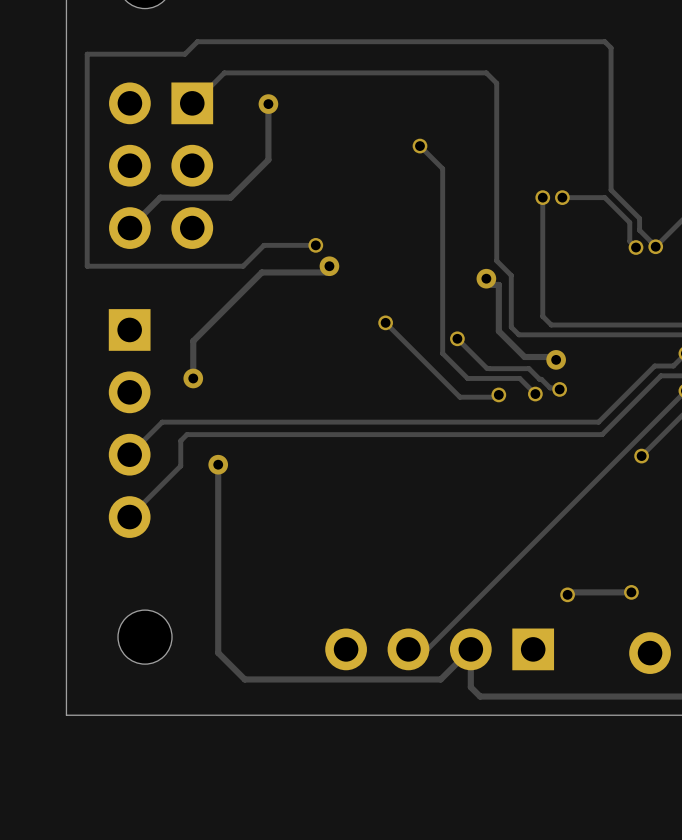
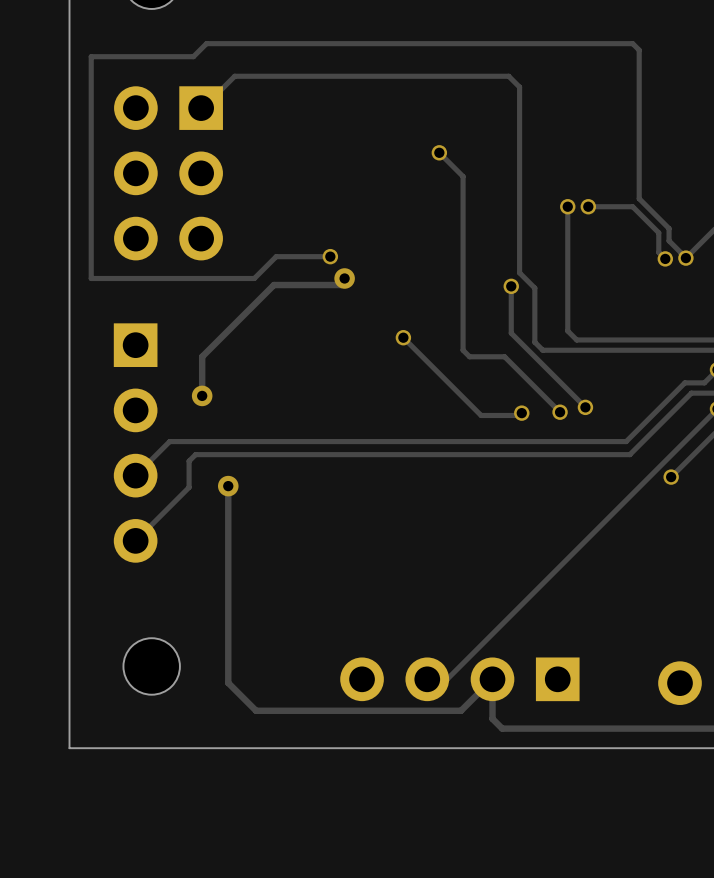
track: (268, 104) (268, 159) (230, 197) (160, 197) (129, 228) -> none
via: (268, 104) -> none
track: (486, 278) (492, 284) (498, 284) (498, 331) (524, 357) (553, 357) (556, 359) -> none
via: (486, 278) -> none
track: (442, 334) (442, 353) (467, 378) (519, 378) -> (463, 350) (469, 356) (504, 356) (543, 395)
track: (457, 338) (488, 368) -> none
via position: (457, 338) -> (511, 286)
via: (556, 359) -> none
track: (489, 368) (529, 368) (550, 387) (558, 387) -> (511, 286) (511, 333) (583, 405)
track: (631, 592) (570, 592) (567, 594) -> none
via: (631, 592) -> none
via: (567, 594) -> none

